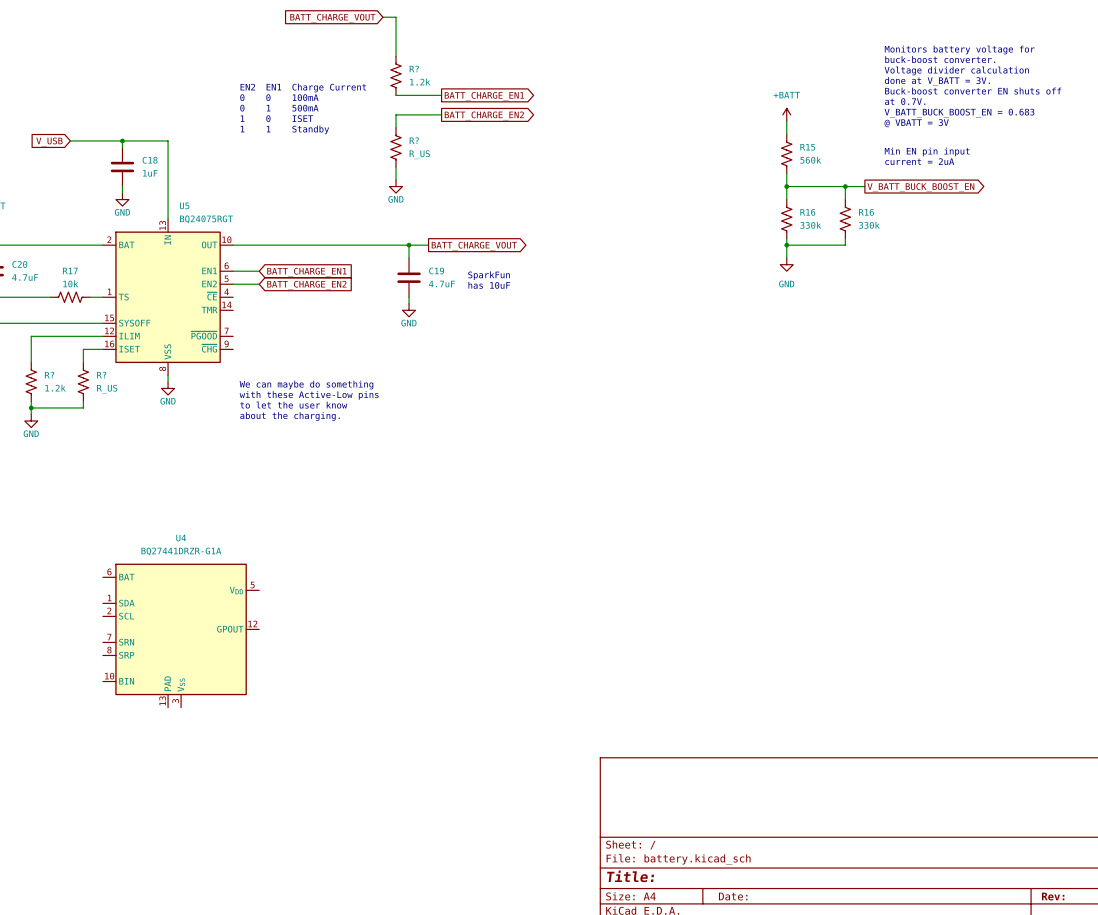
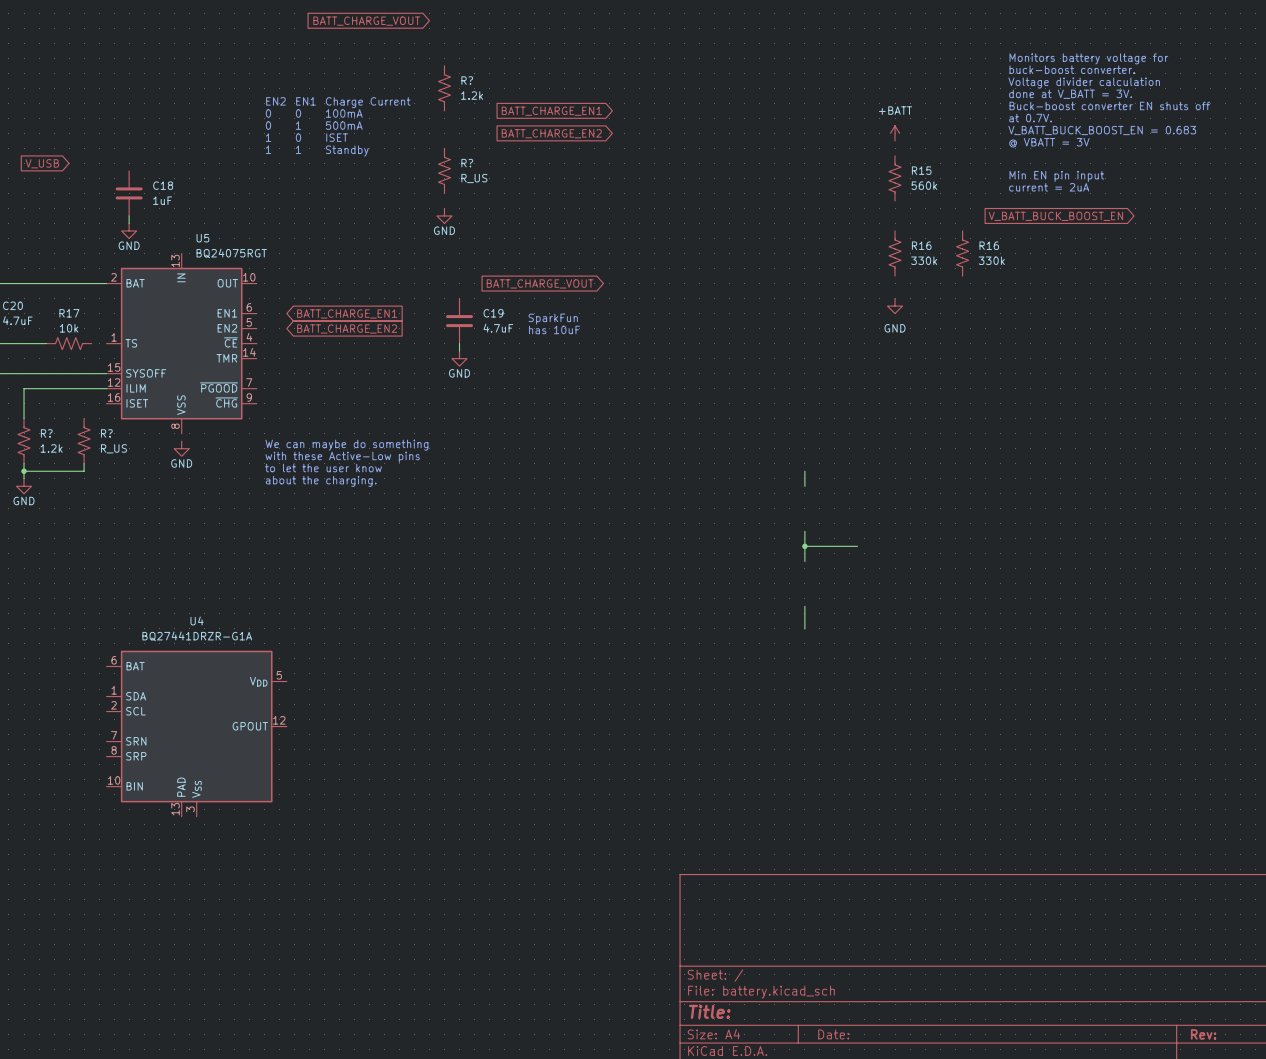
wire: (382, 17) (395, 17) (395, 56) -> none
wire: (395, 95) (441, 95) -> none
wire: (441, 114) (395, 114) (395, 127) -> none
wire: (786, 121) (786, 134) -> none
wire: (70, 140) (168, 140) (168, 219) -> none
wire: (122, 140) (122, 147) -> none
junction: (122, 140) -> none
wire: (395, 167) (395, 180) -> none
wire: (786, 173) (786, 199) -> none
wire: (786, 186) (864, 186) -> none
junction: (786, 186) -> none
wire: (845, 186) (845, 199) -> none
junction: (845, 186) -> none
wire: (786, 238) (786, 258) -> none
wire: (845, 238) (845, 245) (786, 245) -> none
wire: (233, 245) (428, 245) -> none
wire: (409, 245) (409, 258) -> none
junction: (409, 245) -> none
junction: (786, 245) -> none
wire: (233, 271) (259, 271) -> none
wire: (233, 284) (259, 284) -> none
wire: (89, 297) (102, 297) -> none
wire: (102, 349) (83, 349) (83, 362) -> none
wire: (168, 375) (168, 381) -> none
wire: none -> (804, 471) (804, 486)
wire: none -> (804, 531) (804, 561)
wire: none -> (804, 546) (857, 546)
junction: none -> (804, 546)
wire: none -> (804, 606) (804, 628)

